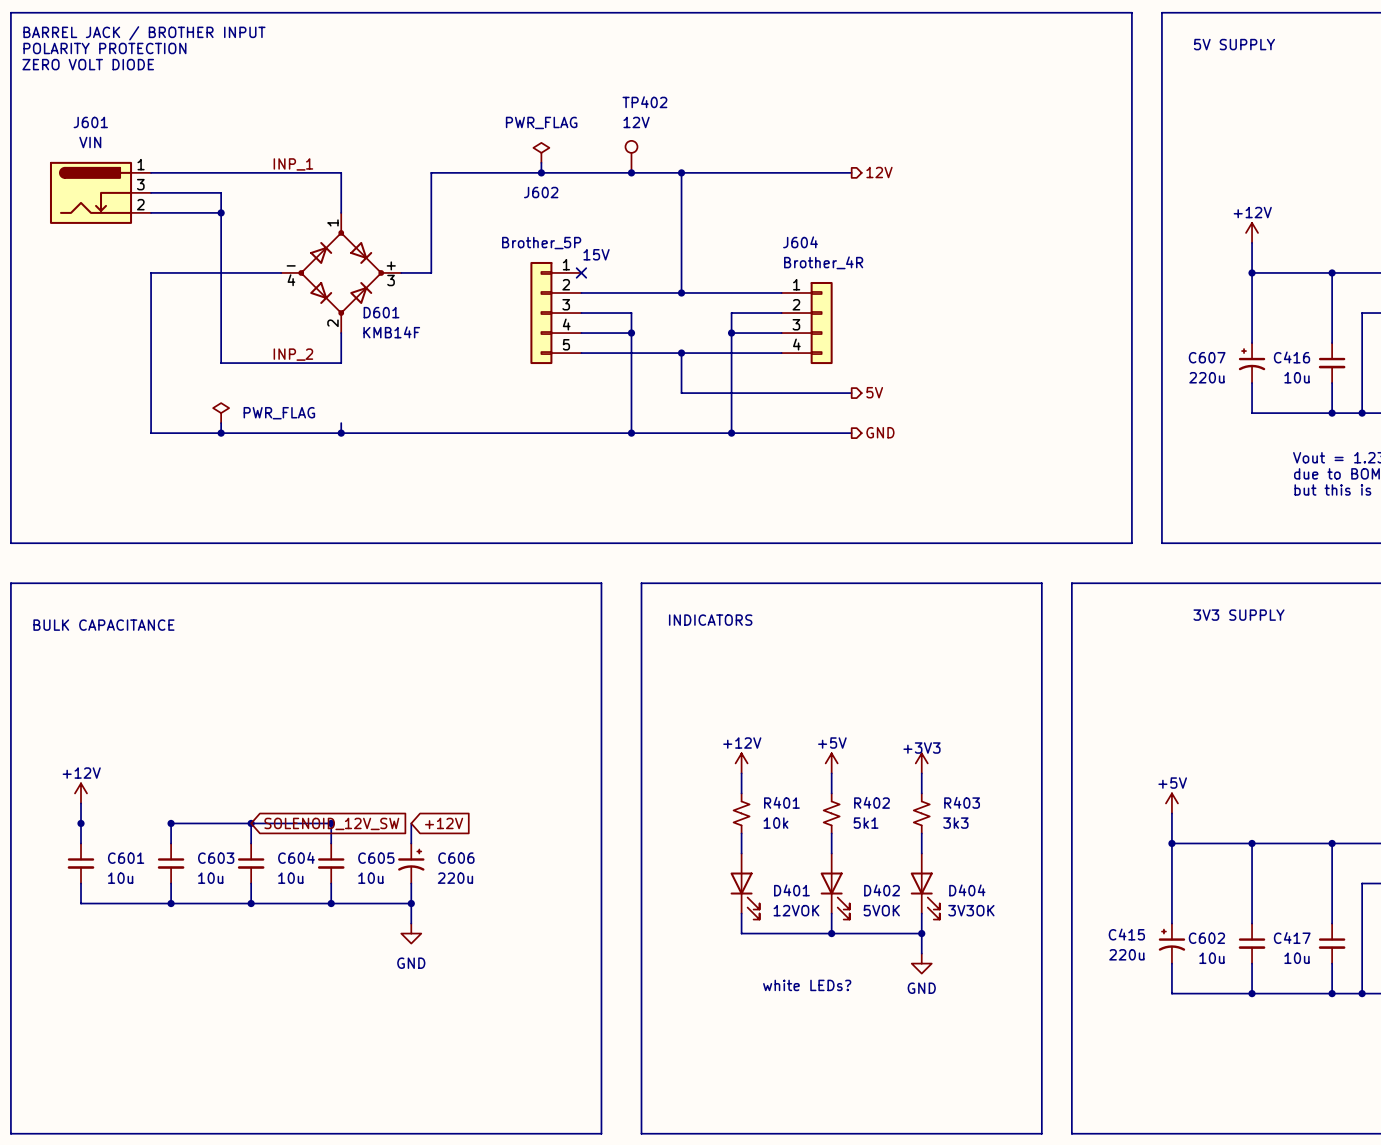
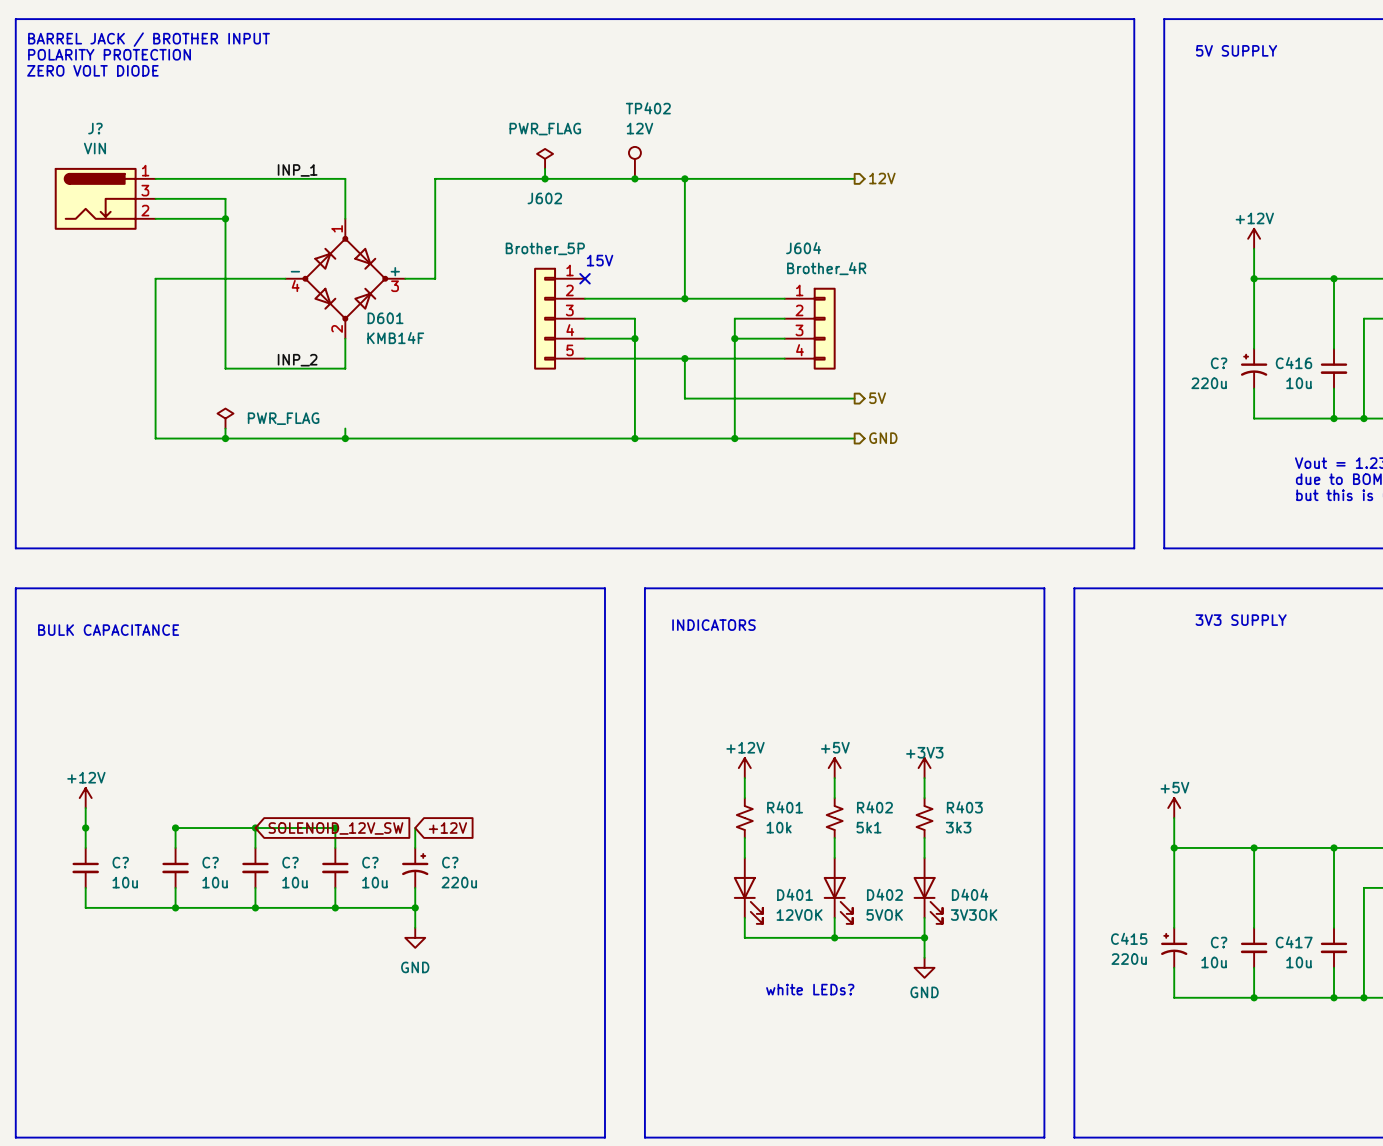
J601 name: J601 (90, 122) -> J? (95, 128)
C607 name: C607 (1207, 357) -> C? (1219, 363)
C604 name: C604 (296, 857) -> C? (290, 862)
C601 name: C601 (126, 858) -> C? (120, 862)
C603 name: C603 (216, 858) -> C? (210, 862)
C605 name: C605 (376, 858) -> C? (370, 862)
C606 name: C606 (456, 858) -> C? (450, 862)
C602 name: C602 (1206, 938) -> C? (1219, 942)

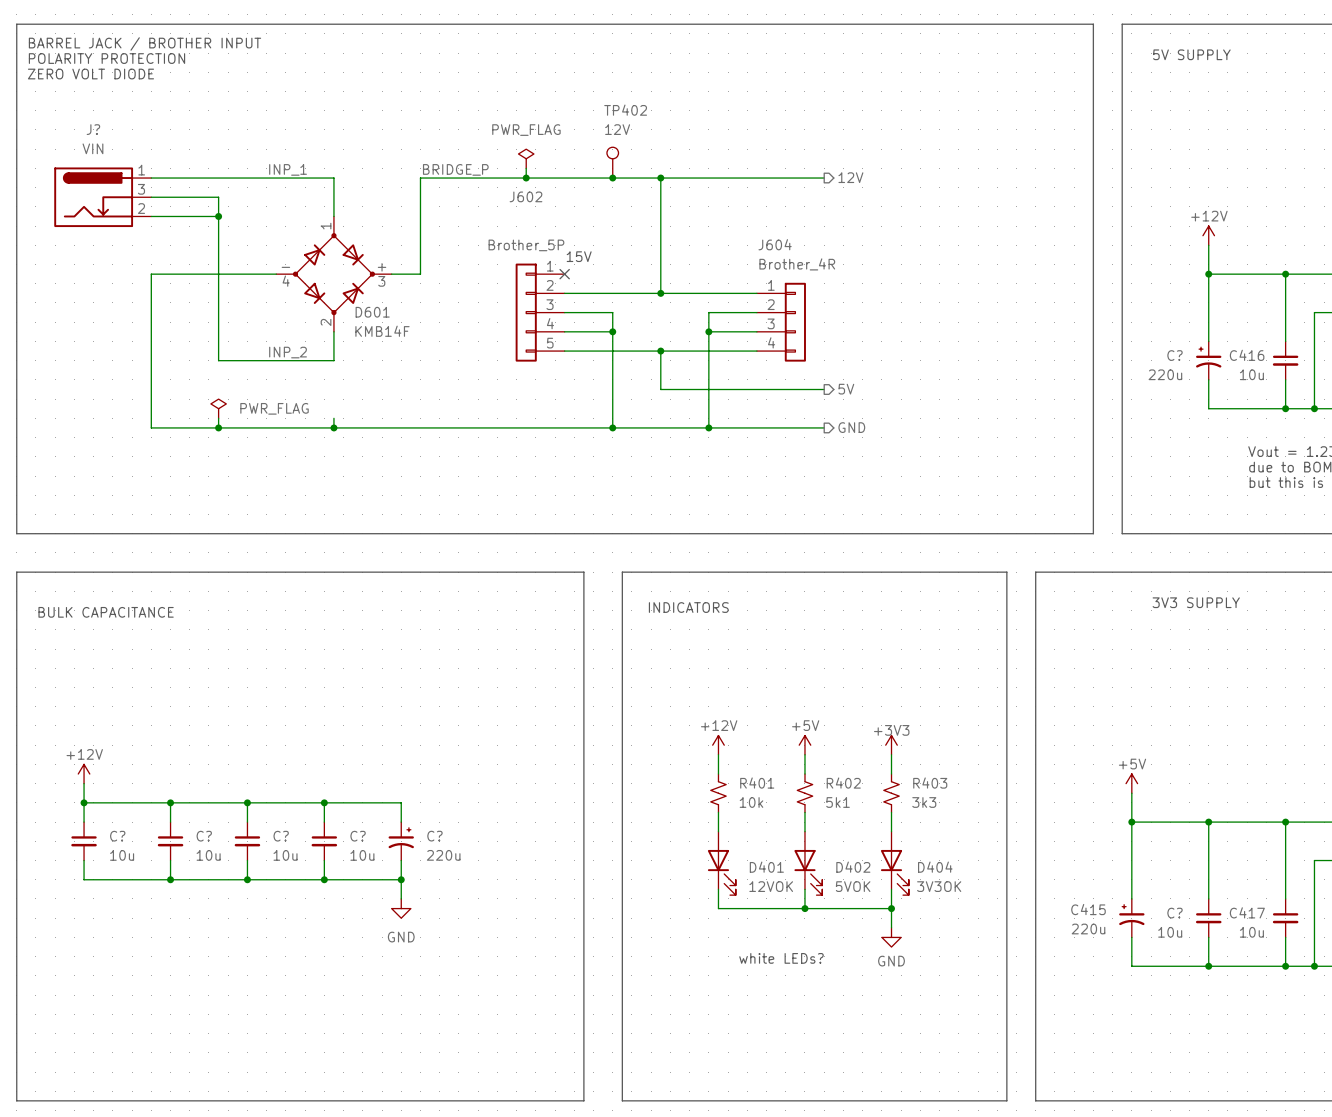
label: none -> BRIDGE_P (455, 169)
wire: none -> (84, 802) (170, 802)
wire: none -> (324, 802) (401, 802)
global label: SOLENOID_12V_SW (335, 828) -> none
global label: +12V (447, 828) -> none

